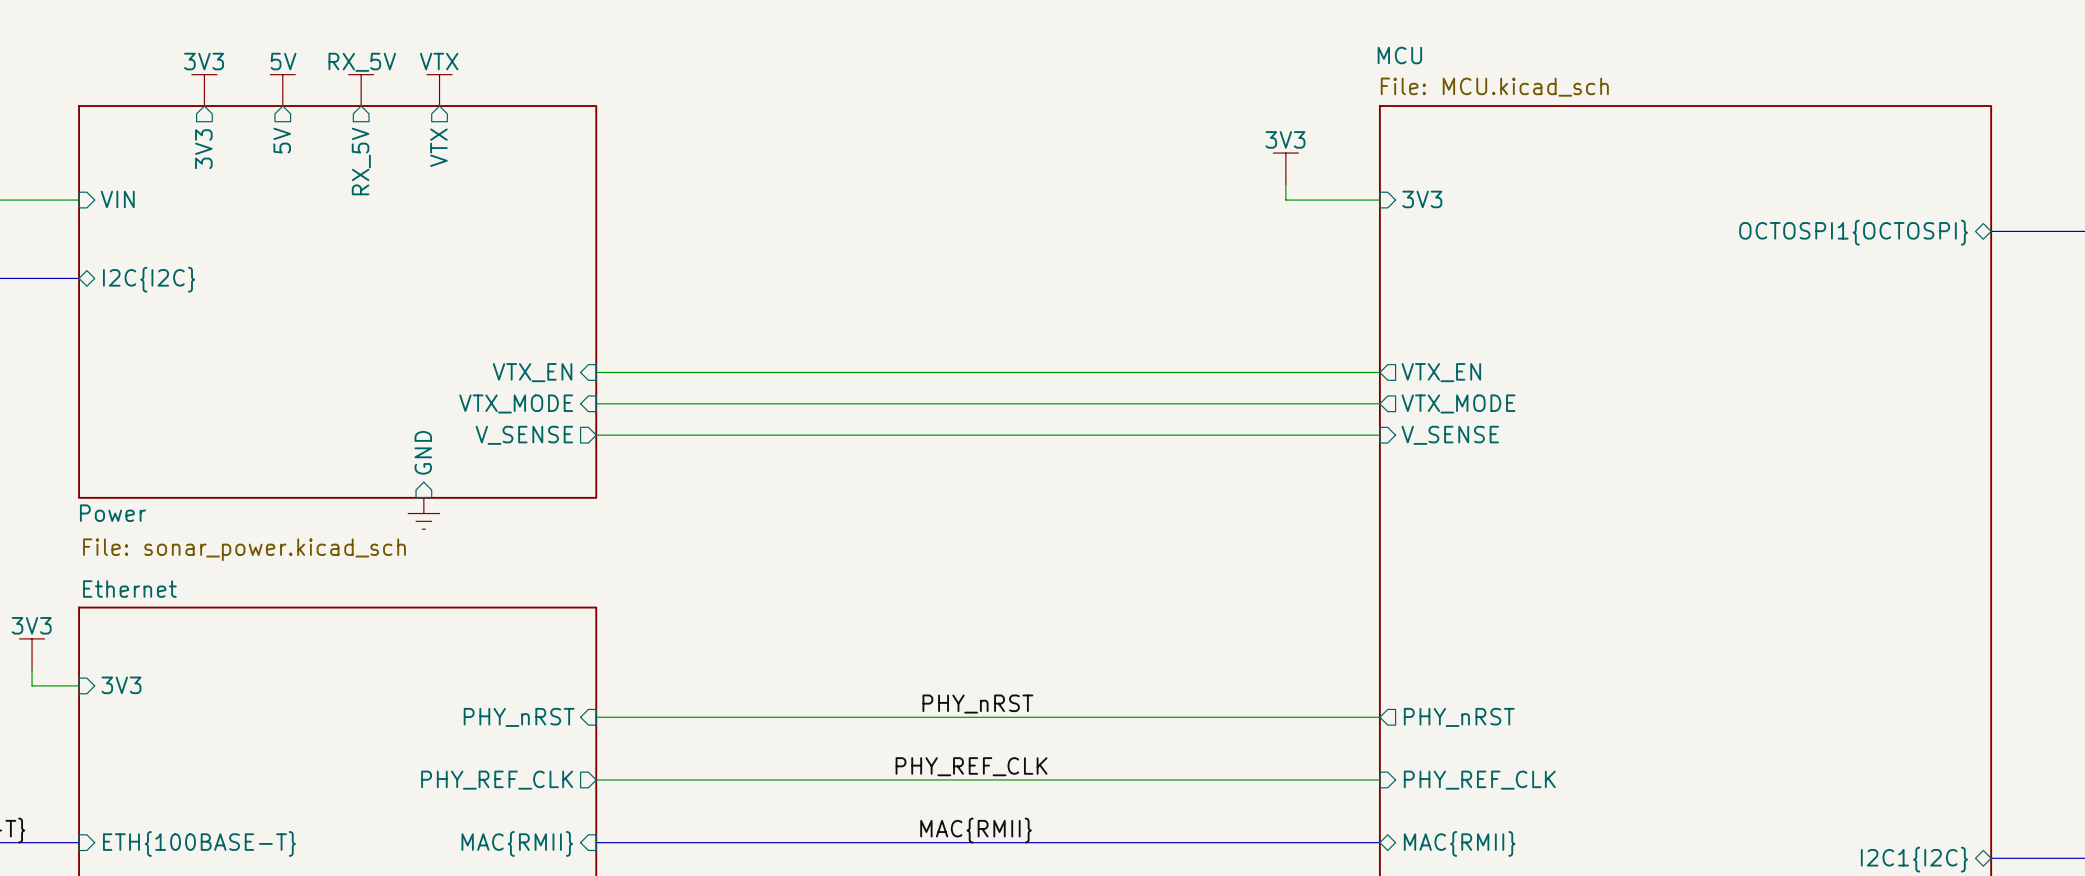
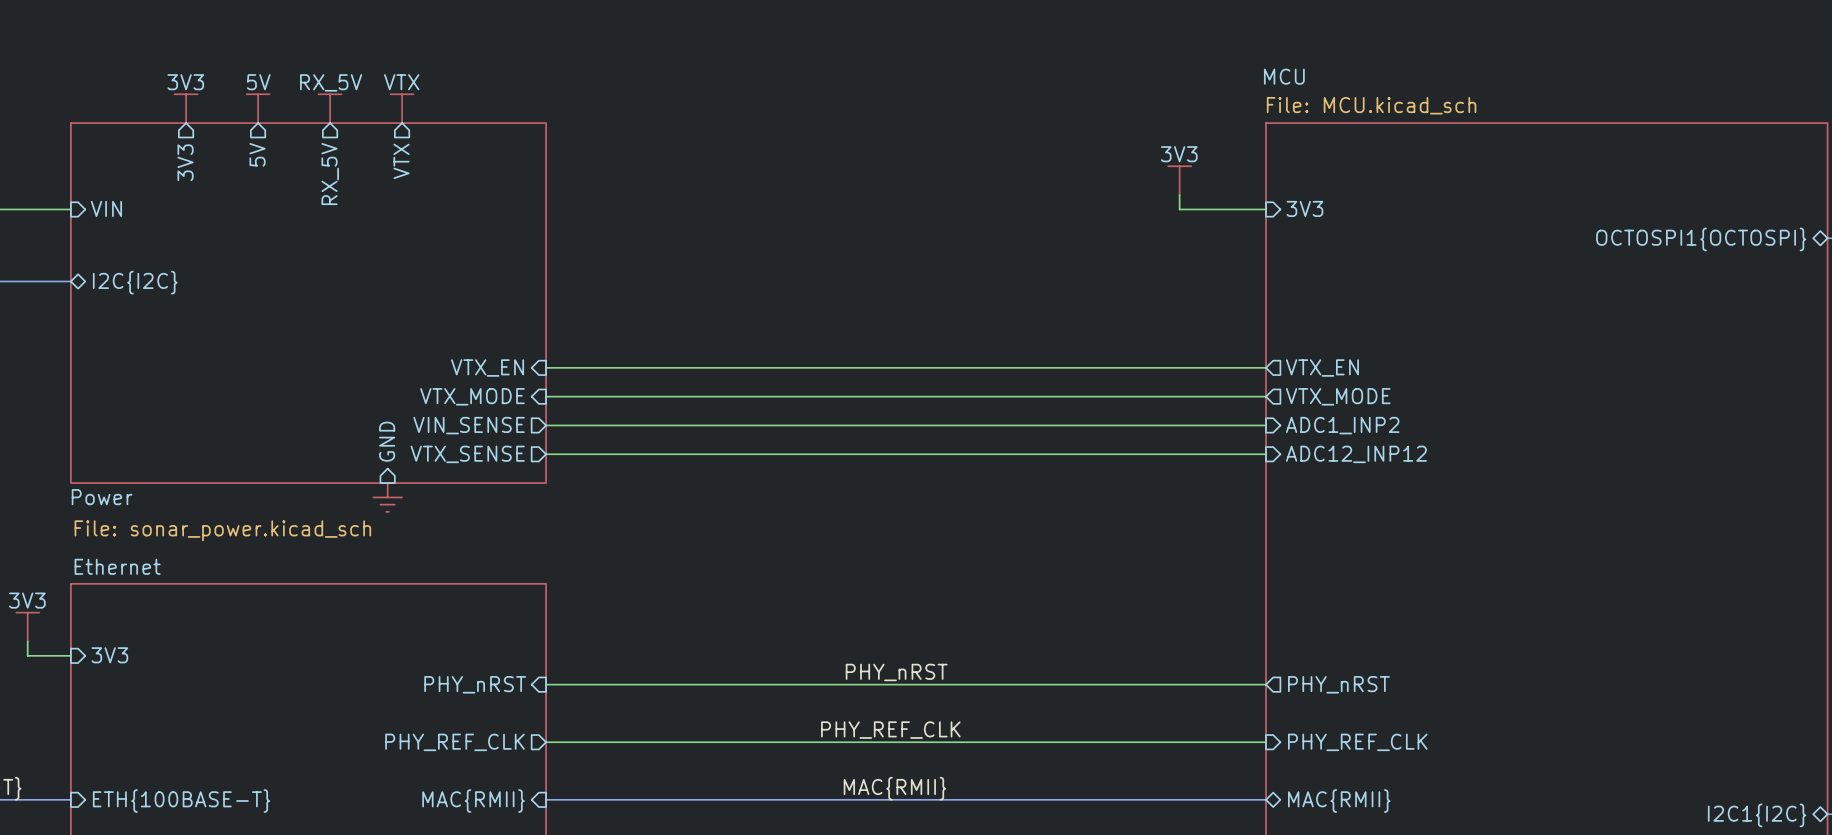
sheet pin: V_SENSE (524, 435) -> VIN_SENSE (469, 425)
sheet pin: V_SENSE (1450, 435) -> ADC1_INP2 (1342, 425)
sheet pin: none -> VTX_SENSE (467, 454)
wire: none -> (546, 454) (1266, 454)
sheet pin: none -> ADC12_INP12 (1356, 454)

